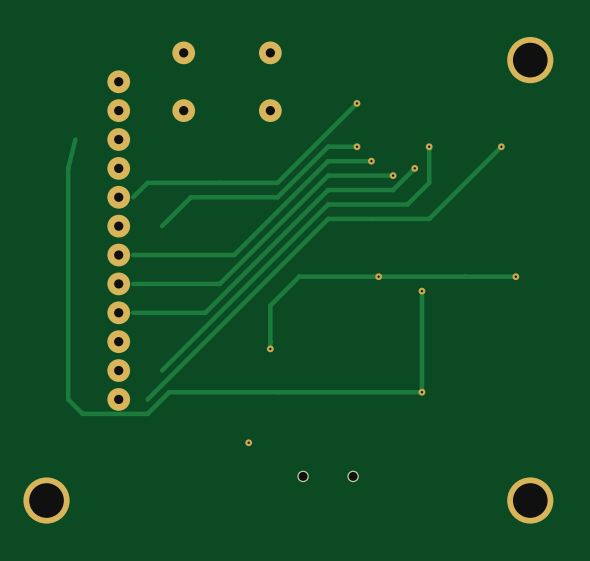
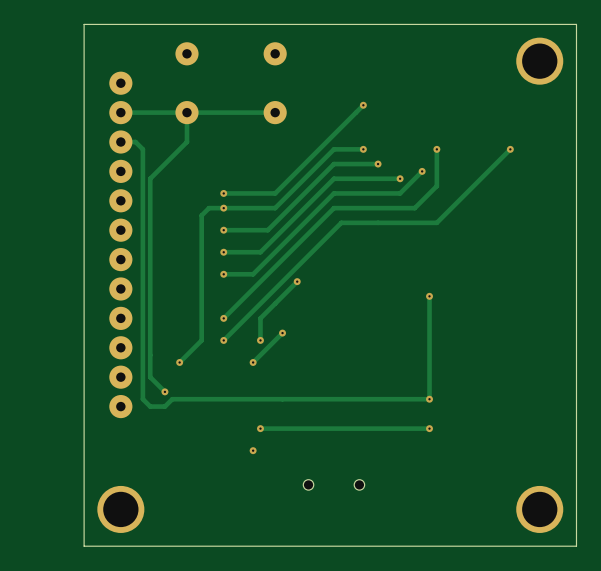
board edge: none -> (576, 24) (576, 546) (84, 546) (84, 24) (576, 24)
track: none -> (186, 112) (186, 142) (150, 178) (150, 377) (164, 391)
track: none -> (275, 112) (120, 112)
track: (75, 139) (68, 168) (68, 399) (82, 413) (147, 413) (162, 399) -> (120, 142) (135, 142) (142, 149) (142, 399) (150, 406) (164, 406)
track: (277, 182) (147, 182) (133, 197) -> (282, 186) (275, 193) (223, 193)
via: none -> (223, 193)
track: (277, 197) (190, 197) (162, 226) -> (282, 200) (275, 208) (209, 208) (201, 215) (201, 340)
via: none -> (223, 208)
track: (335, 218) (328, 218) (147, 399) -> (341, 222) (223, 340)
via: none -> (223, 230)
track: (263, 226) (234, 255) (133, 255) -> (267, 230) (223, 230)
via: none -> (223, 252)
track: (255, 247) (219, 283) (133, 283) -> (260, 252) (223, 252)
via: none -> (223, 274)
track: (248, 269) (205, 312) (133, 312) -> (253, 274) (223, 274)
track: none -> (297, 281) (260, 318) (260, 340)
via: none -> (297, 281)
via: (378, 276) -> none
track: (515, 276) (299, 276) (270, 305) (270, 348) -> none
via: (515, 276) -> none
track: (219, 312) (198, 334) -> none
via: none -> (223, 318)
track: none -> (282, 333) (253, 362)
via: none -> (282, 333)
via: none -> (223, 340)
via: none -> (260, 340)
via: (270, 348) -> none
track: (176, 356) (162, 370) -> none
via: none -> (179, 362)
via: none -> (253, 362)
via: none -> (164, 391)
via: none -> (260, 428)
track: none -> (429, 428) (260, 428)
via: none -> (429, 428)
part position: (46, 500) -> (120, 509)

